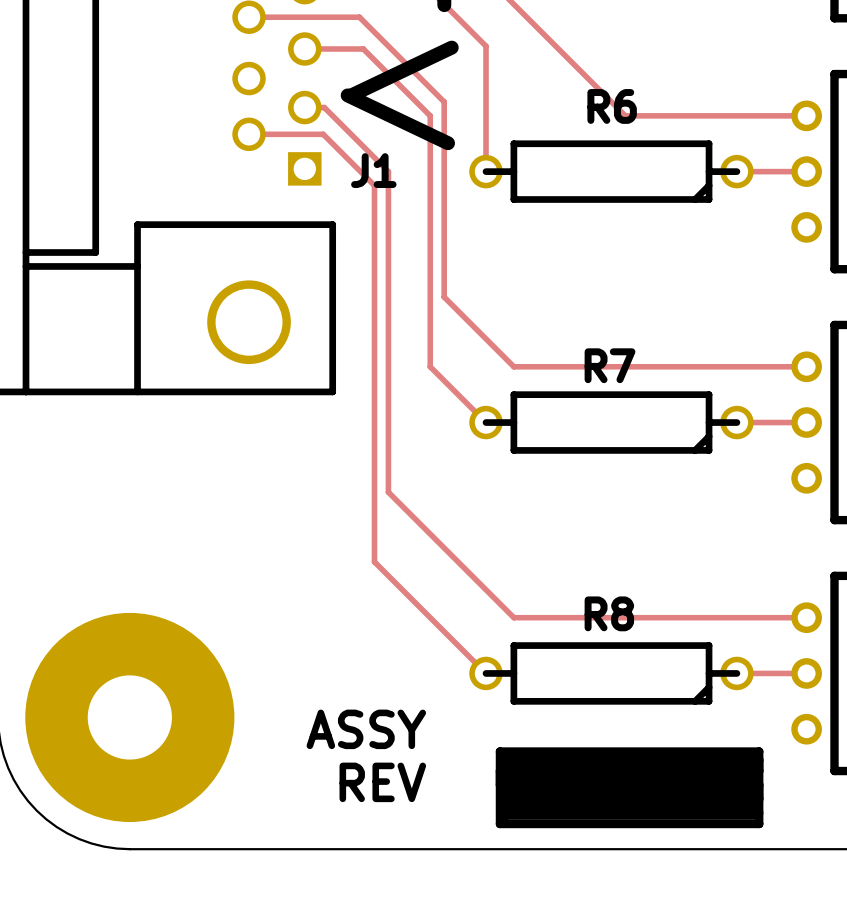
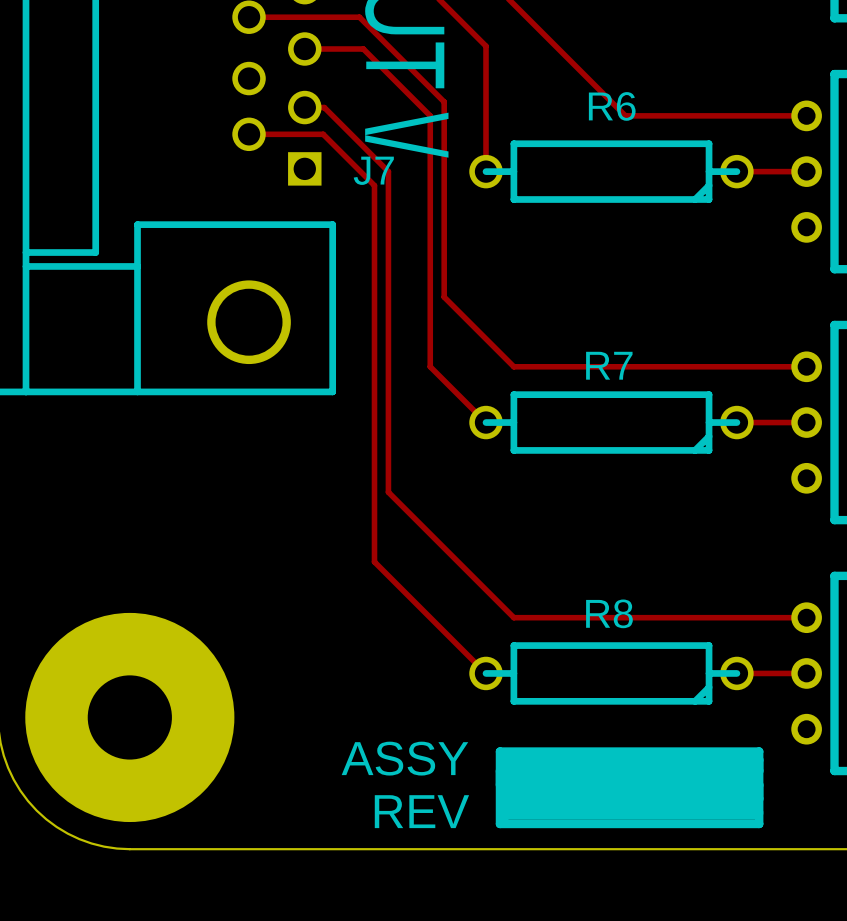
J1 name: J1 (373, 170) -> J7 (373, 170)
text position: ASSY (366, 729) -> ASSY (404, 758)
text position: REV (382, 782) -> REV (421, 811)

